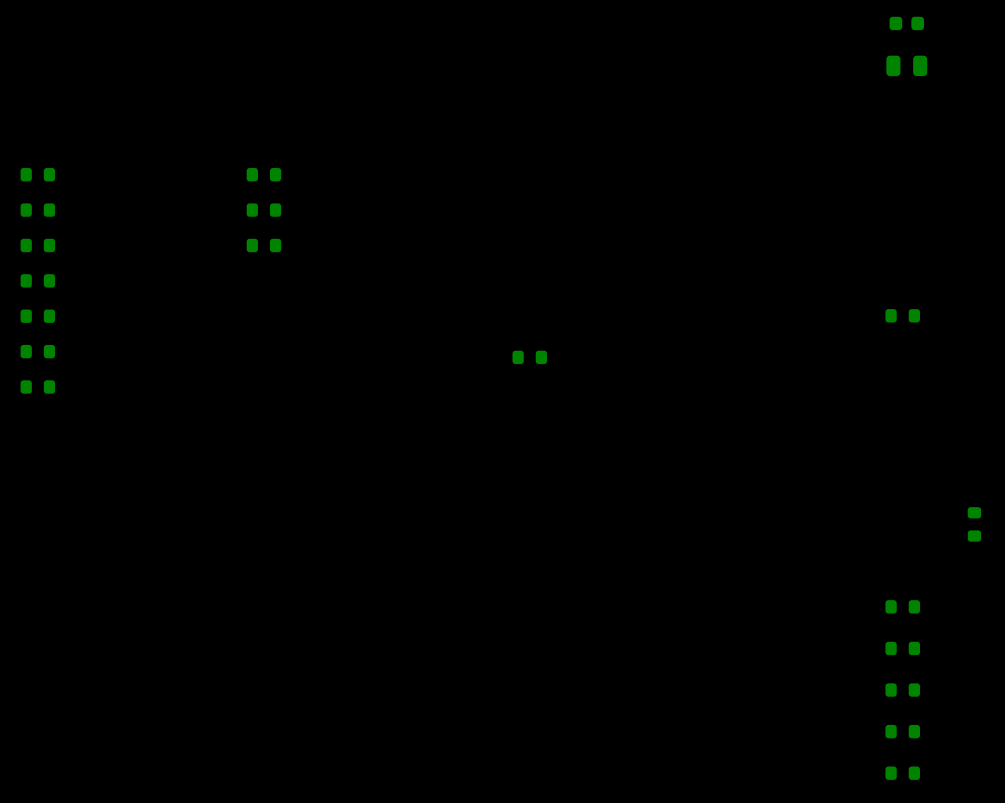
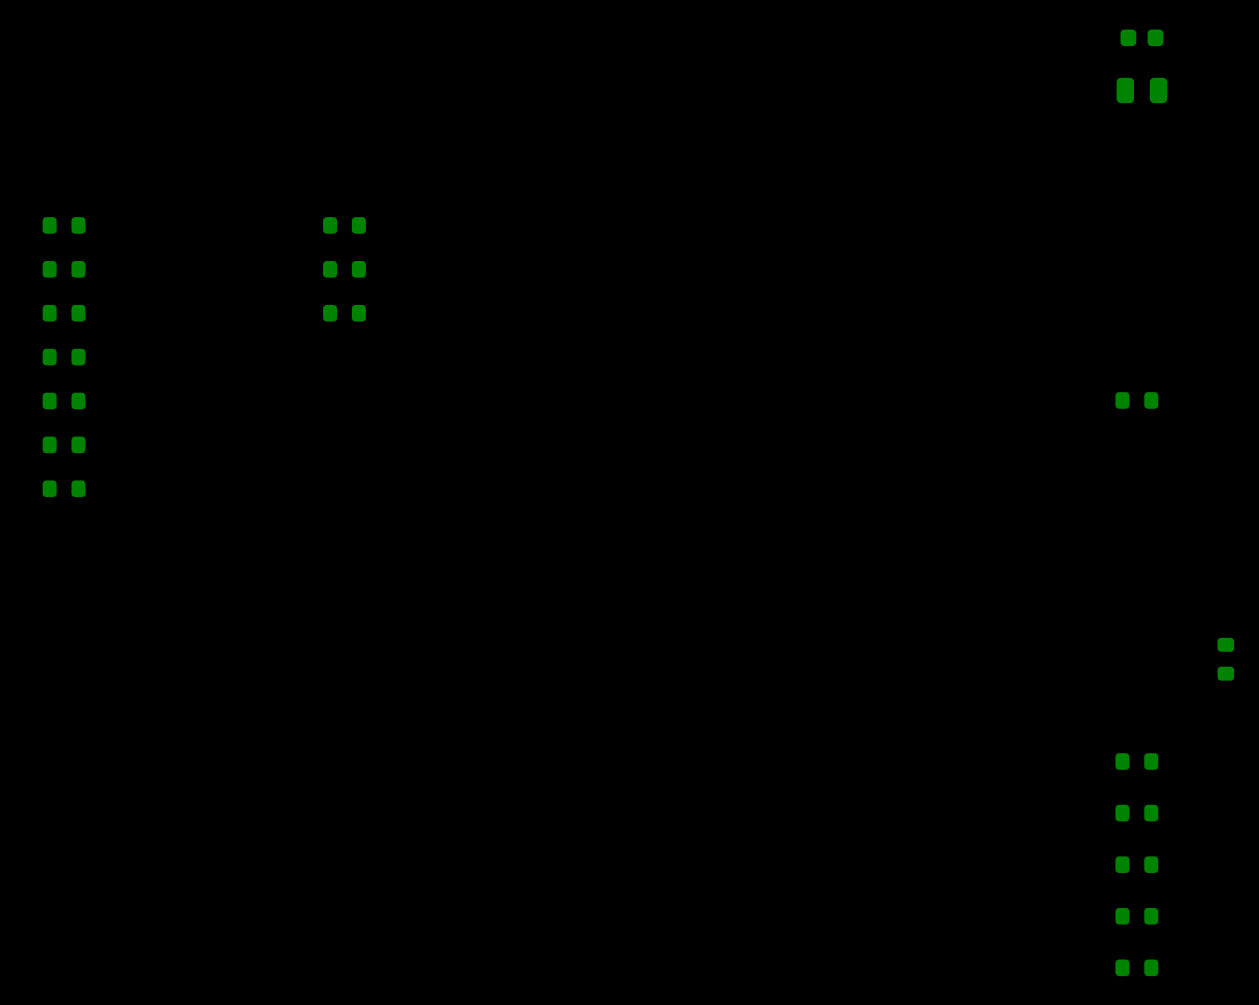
part: (529, 357) -> none

